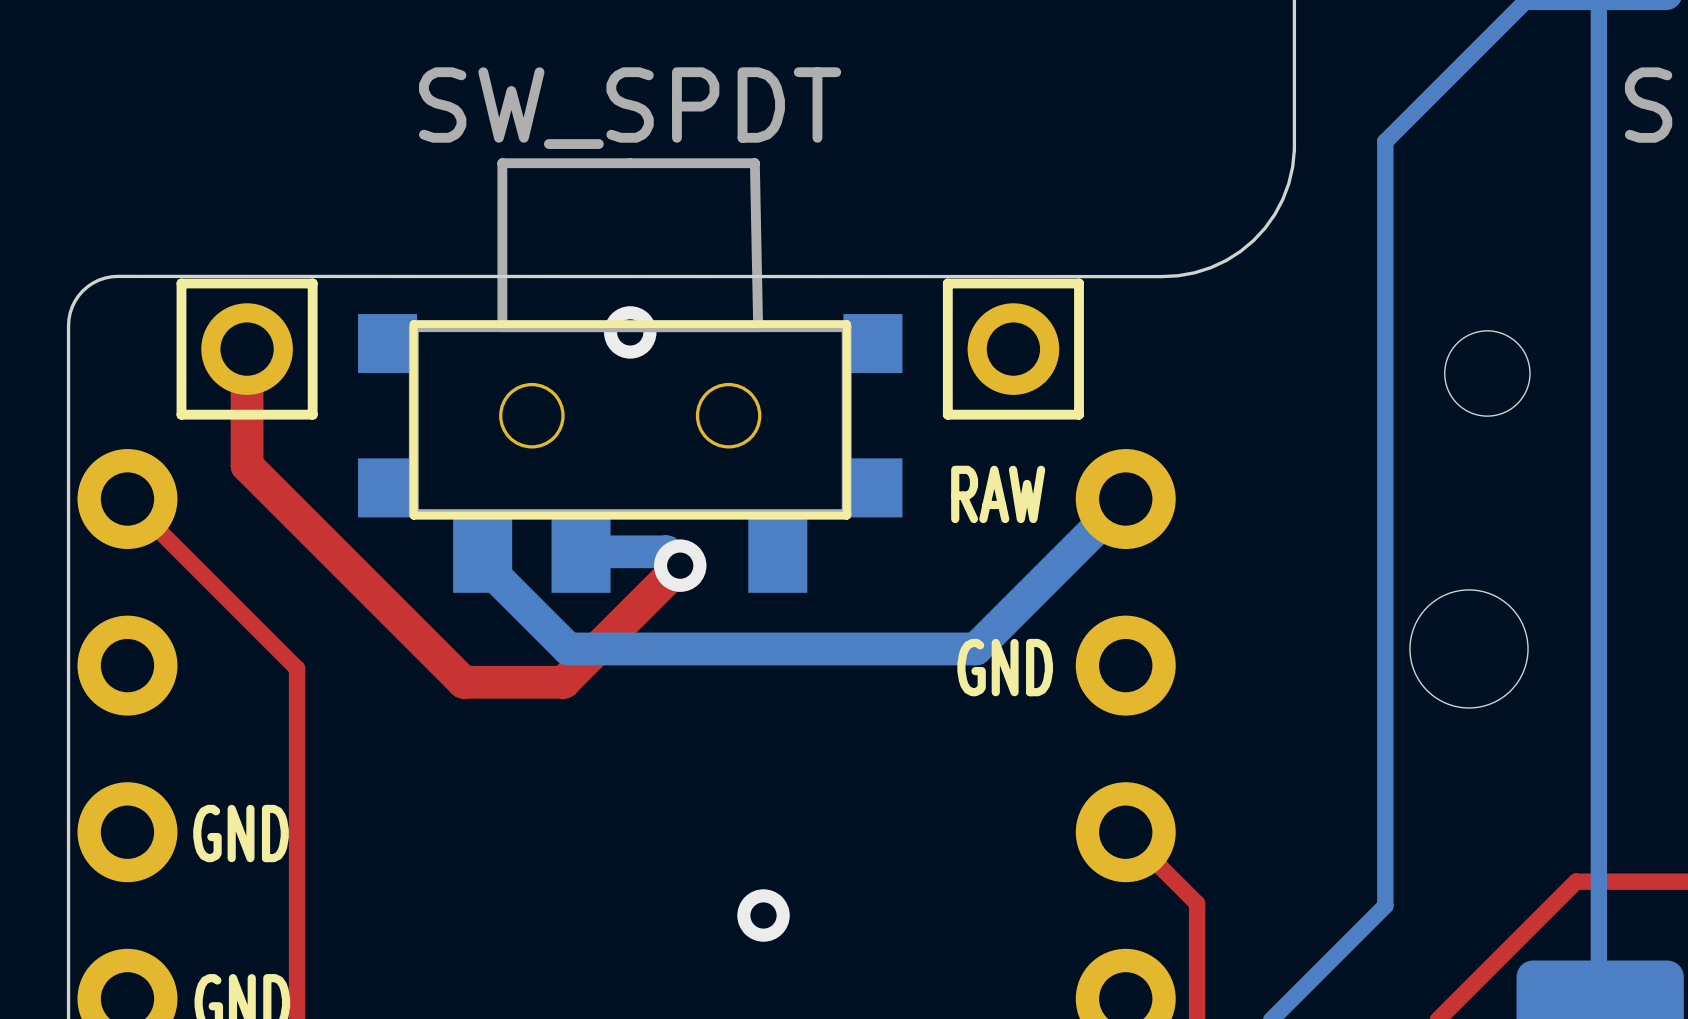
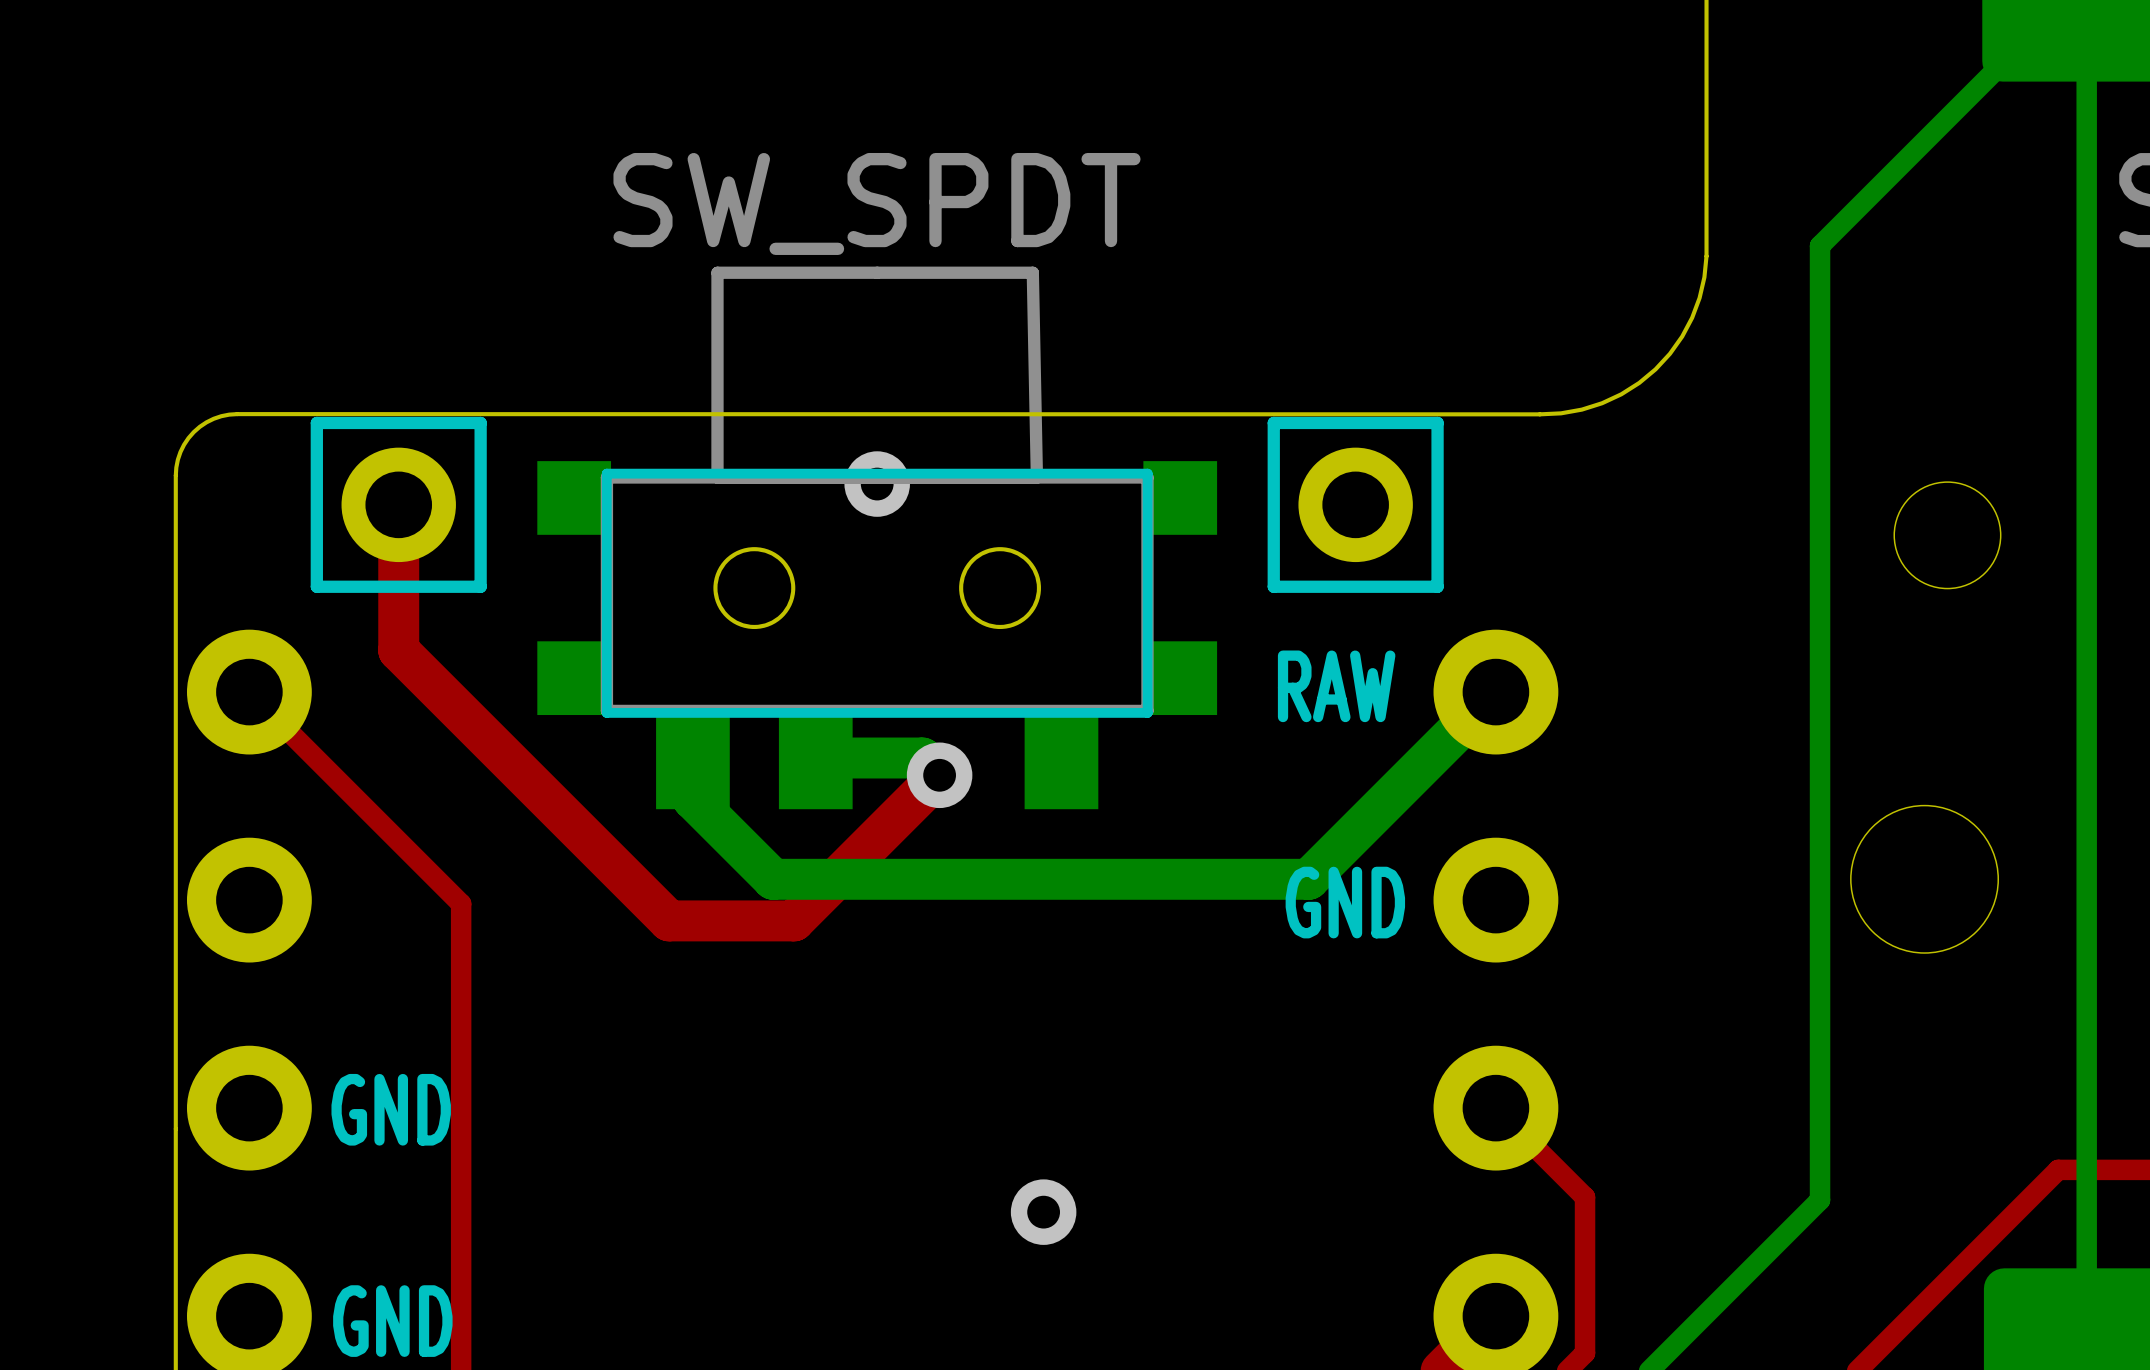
bottom track: (482, 563) (568, 648) -> (692, 772) (692, 799) (773, 879) (799, 879)

